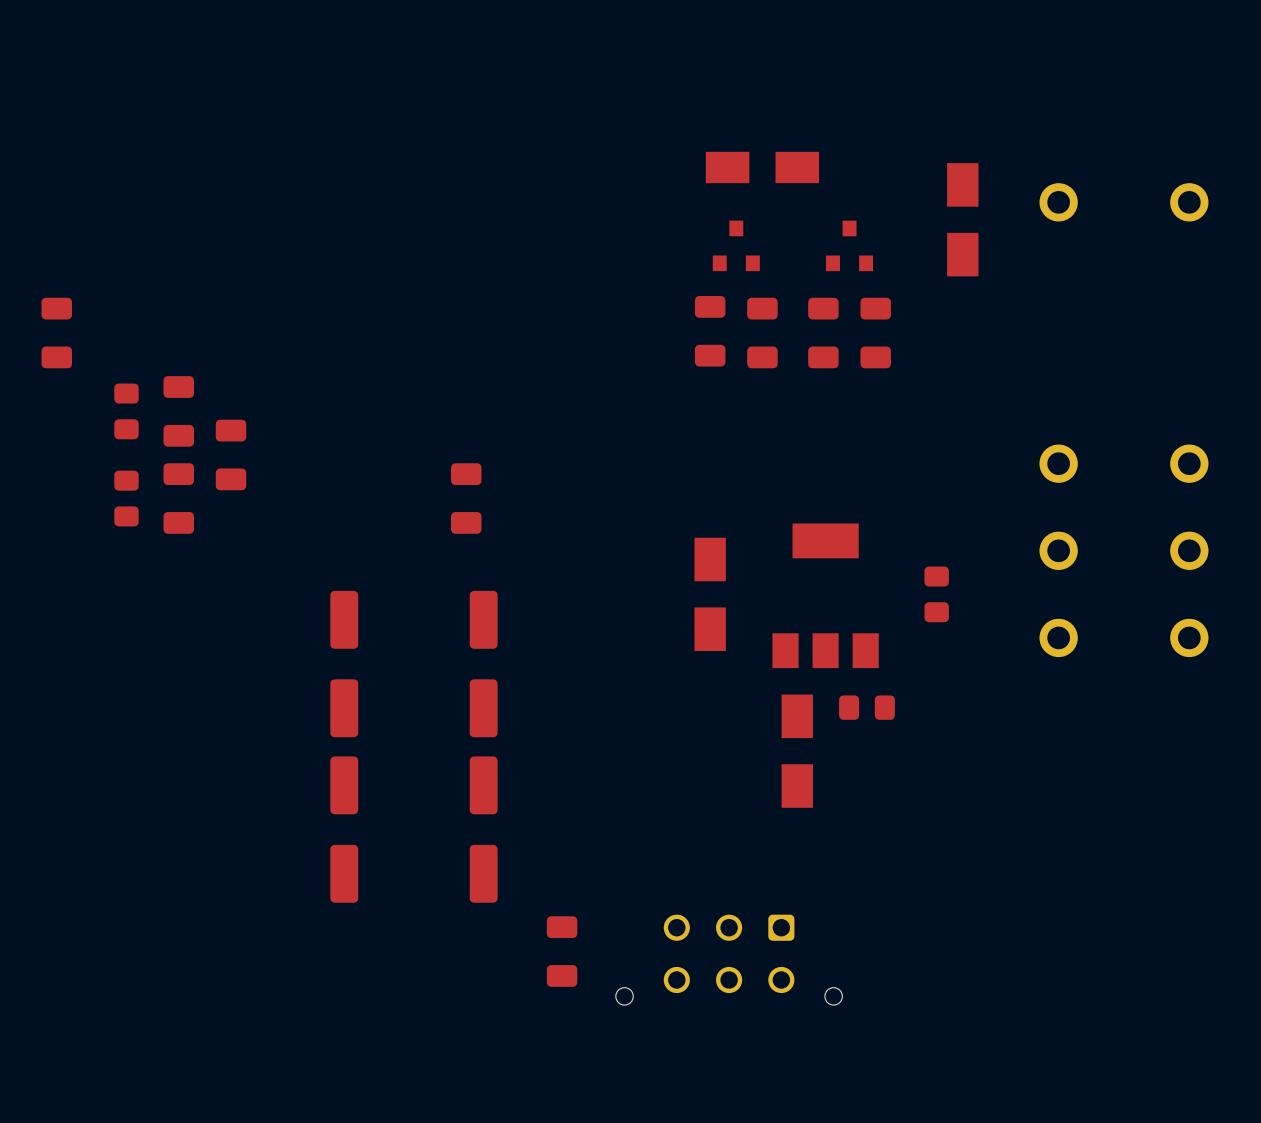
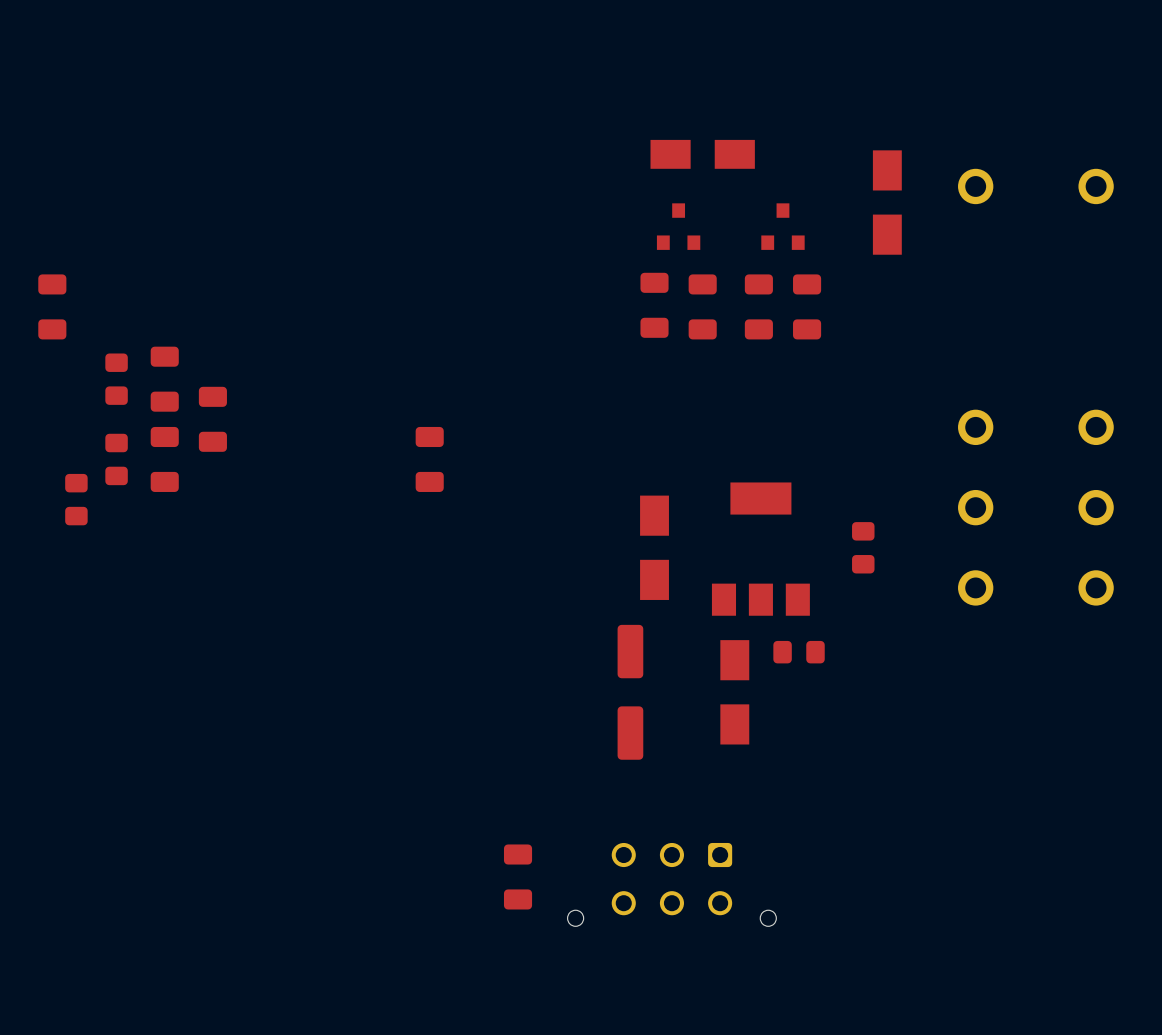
part: none -> (76, 499)
part: (344, 664) -> none
part: (483, 664) -> none
part: none -> (630, 692)
part: (344, 829) -> none
part: (483, 829) -> none

